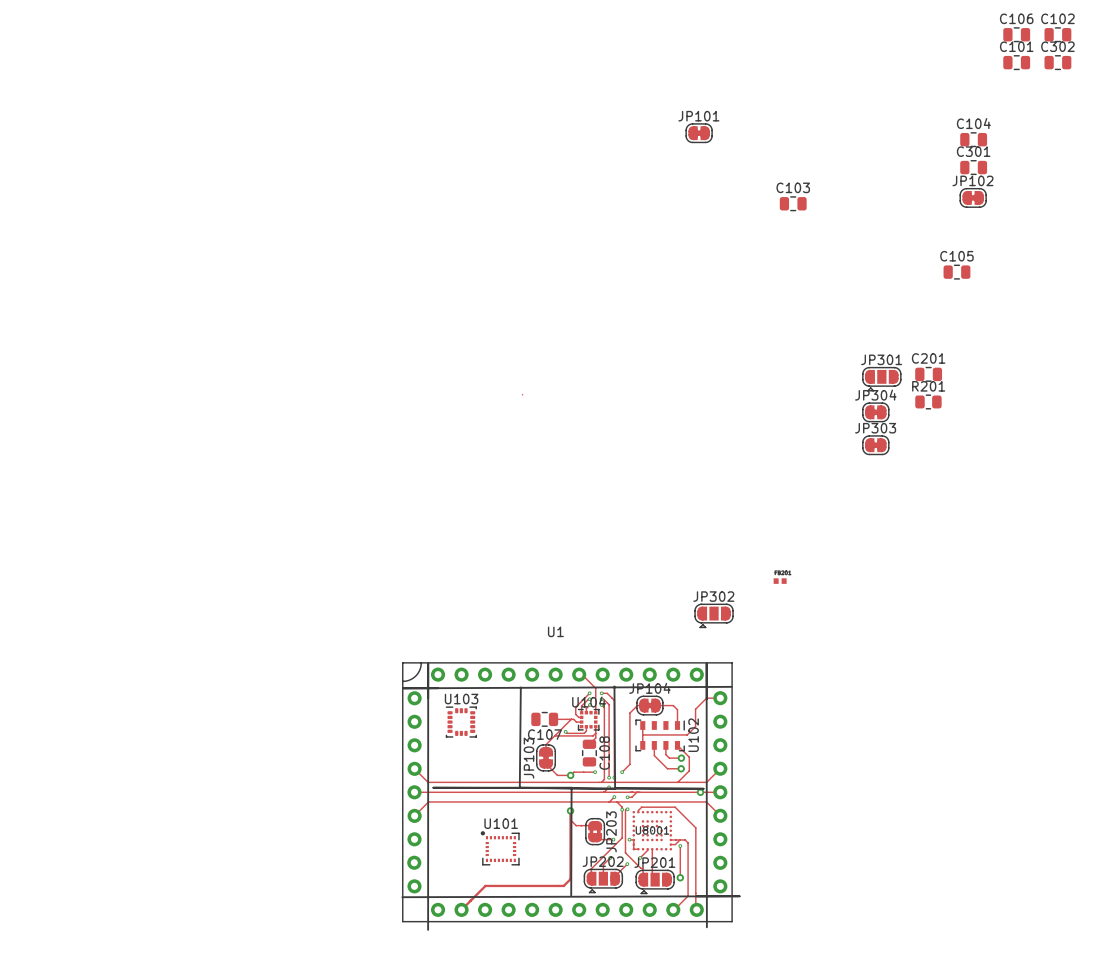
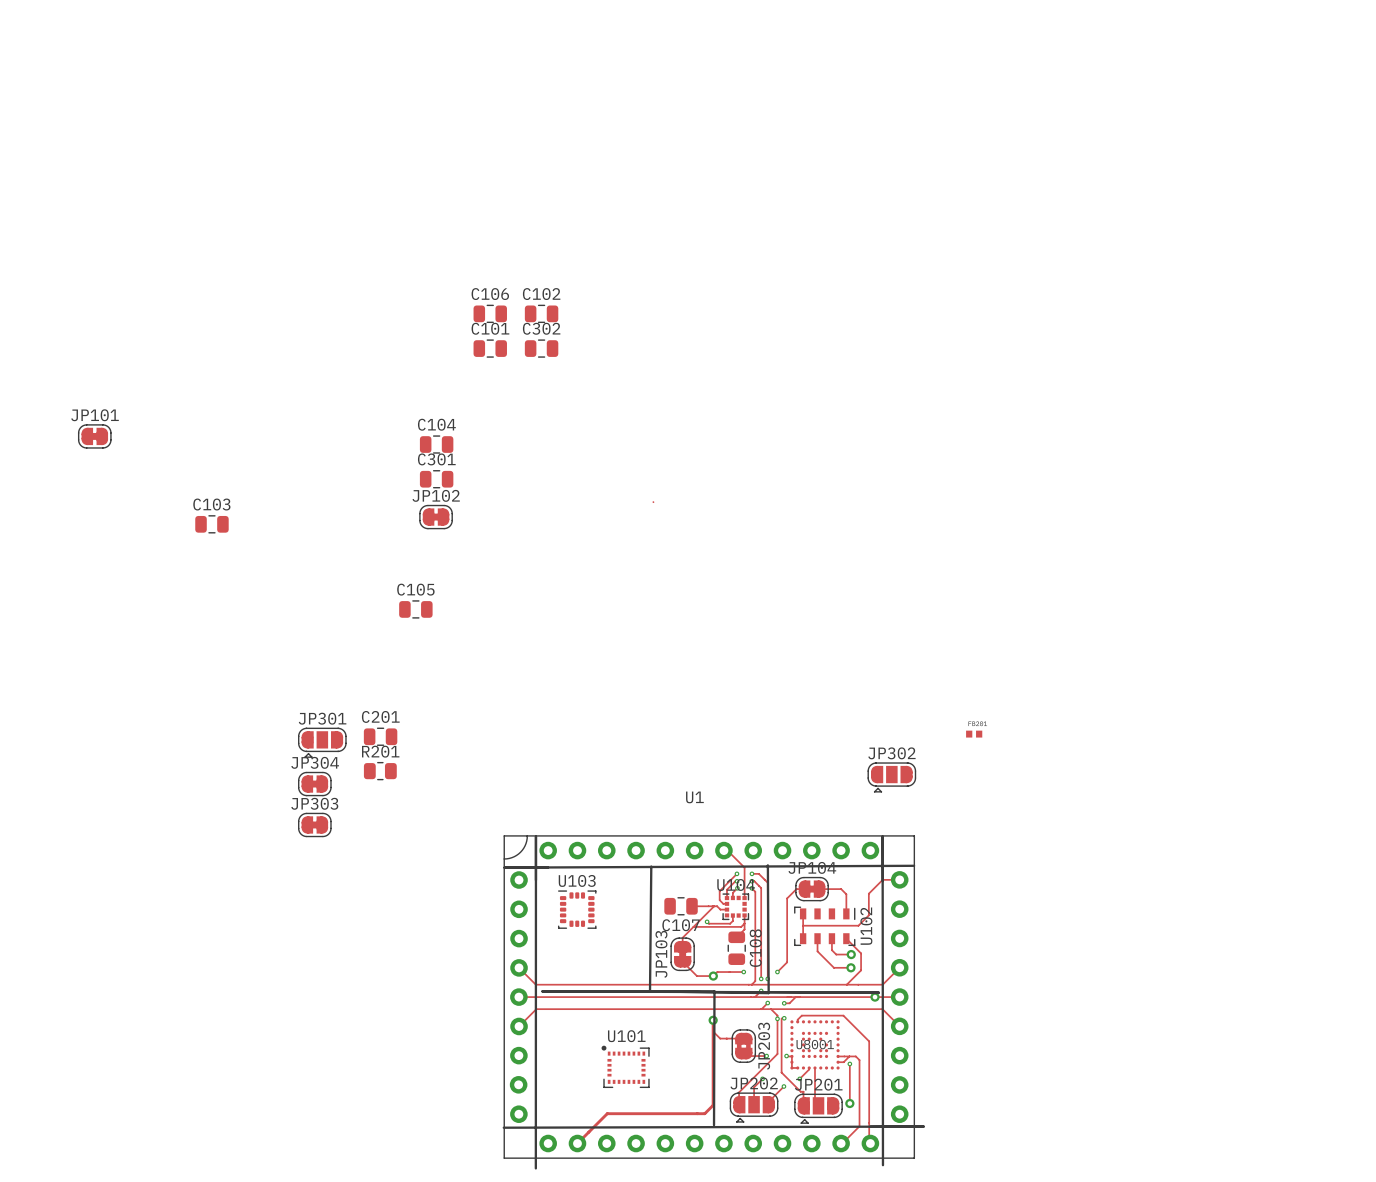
C106 position: (1016, 34) -> (490, 313)
C102 position: (1057, 34) -> (541, 313)
C101 position: (1016, 62) -> (490, 348)
C302 position: (1057, 62) -> (541, 348)
JP101 position: (699, 133) -> (94, 436)
C104 position: (973, 139) -> (436, 444)
C301 position: (973, 167) -> (436, 479)
JP102 position: (973, 197) -> (436, 517)
C103 position: (793, 203) -> (211, 524)
C105 position: (956, 272) -> (415, 609)
C201 position: (928, 374) -> (380, 736)
JP301 position: (881, 379) -> (322, 742)
R201 position: (928, 401) -> (380, 771)
JP304 position: (875, 412) -> (314, 784)
JP303 position: (875, 445) -> (314, 824)

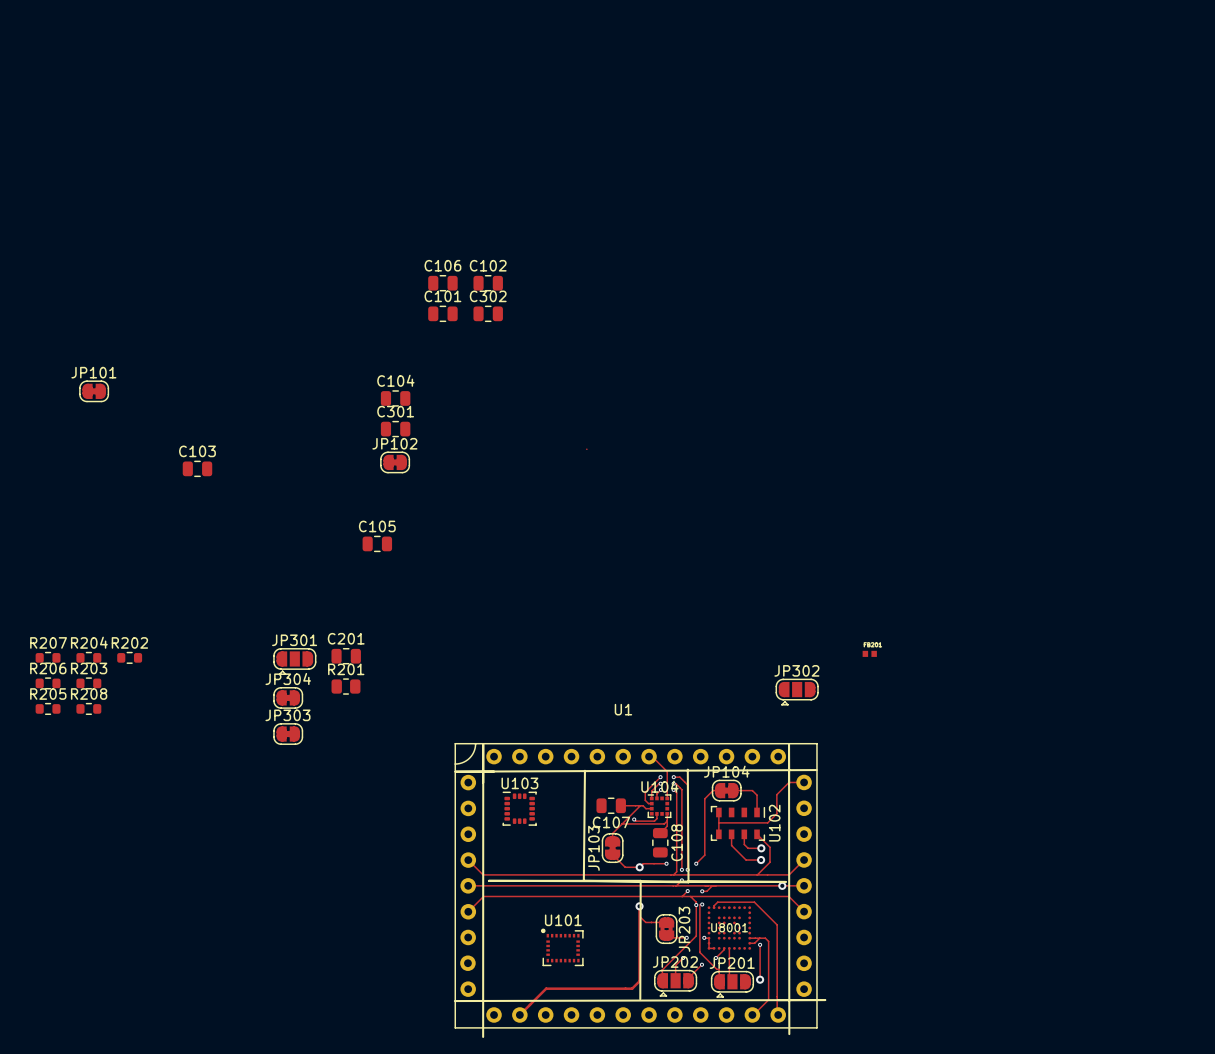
R207: none -> (48, 657)
R204: none -> (88, 657)
R202: none -> (129, 657)
R206: none -> (48, 683)
R203: none -> (88, 683)
R205: none -> (48, 708)
R208: none -> (88, 708)

